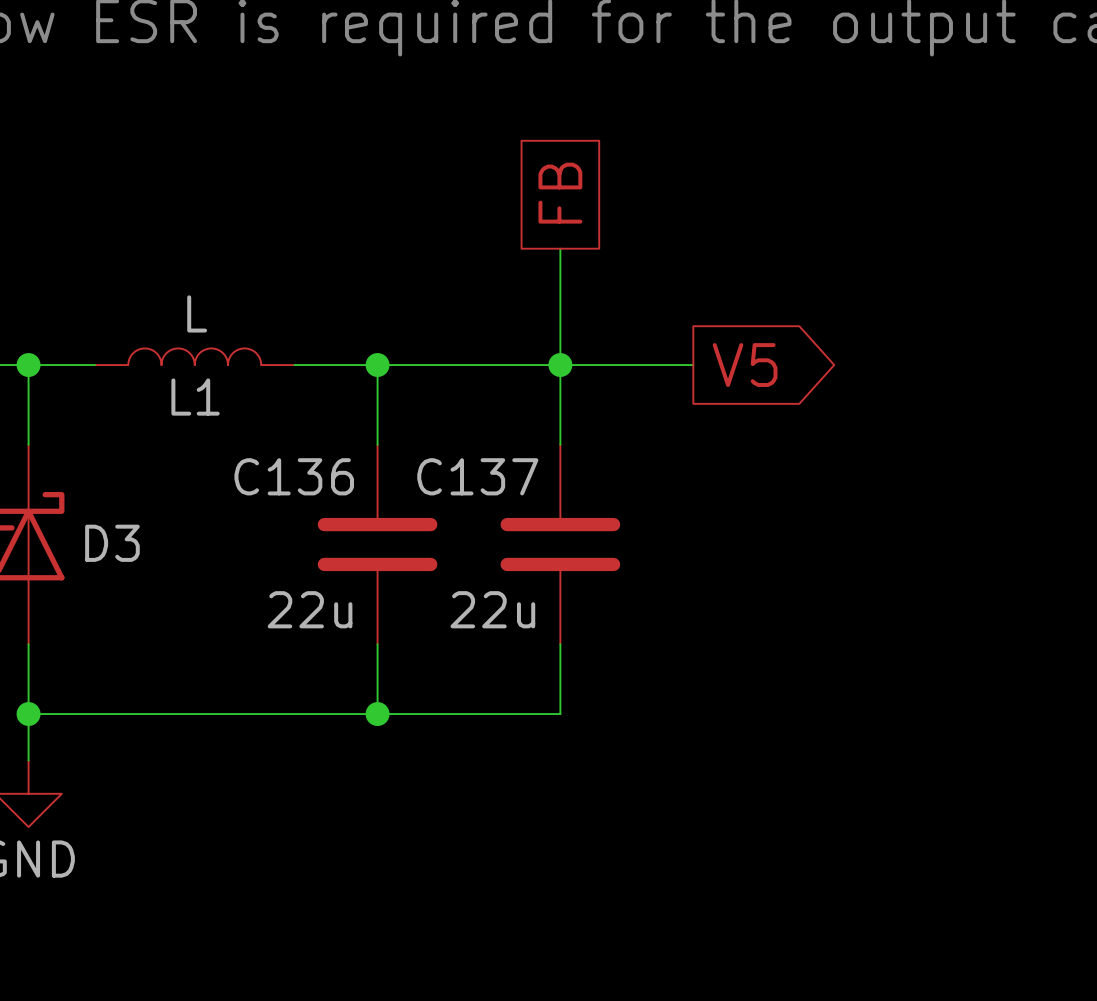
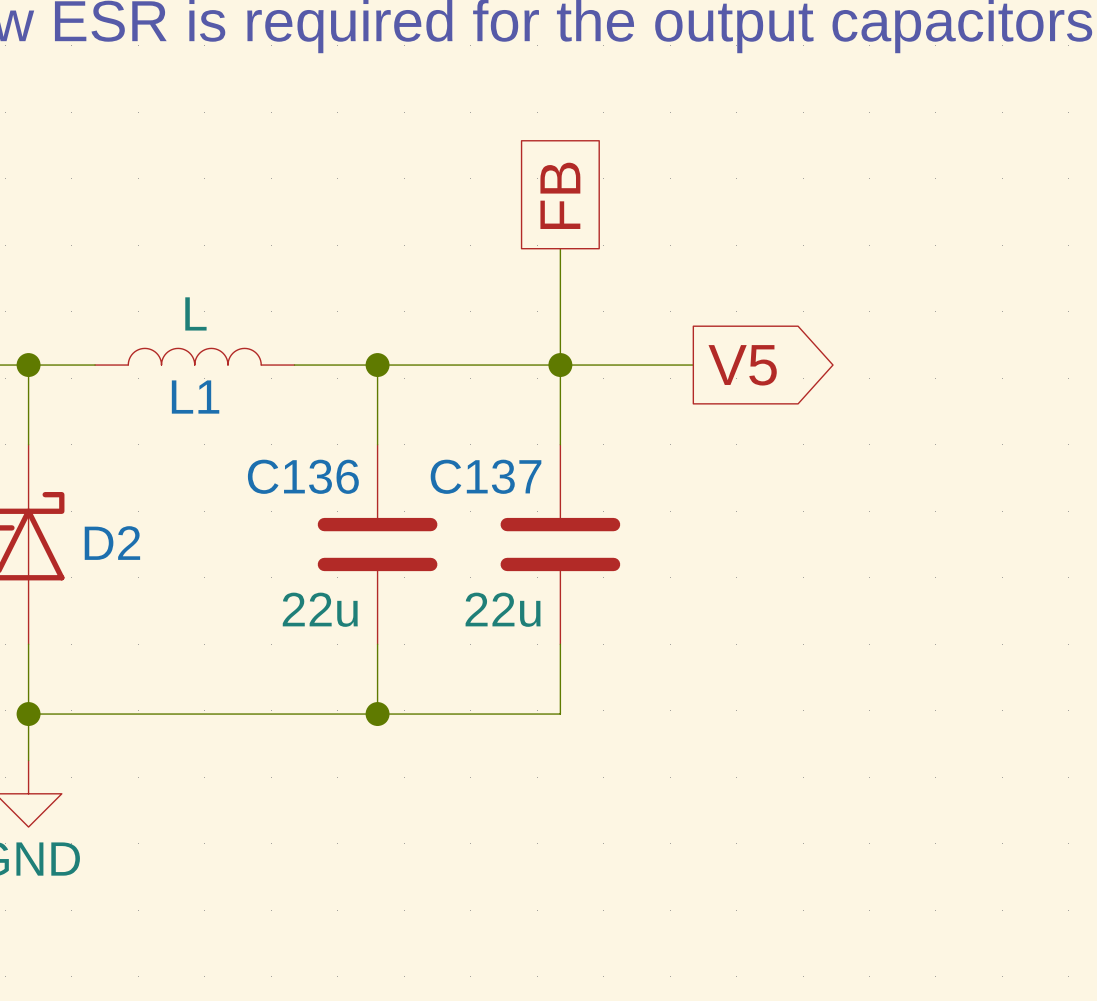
D3 name: D3 (112, 543) -> D2 (112, 543)

